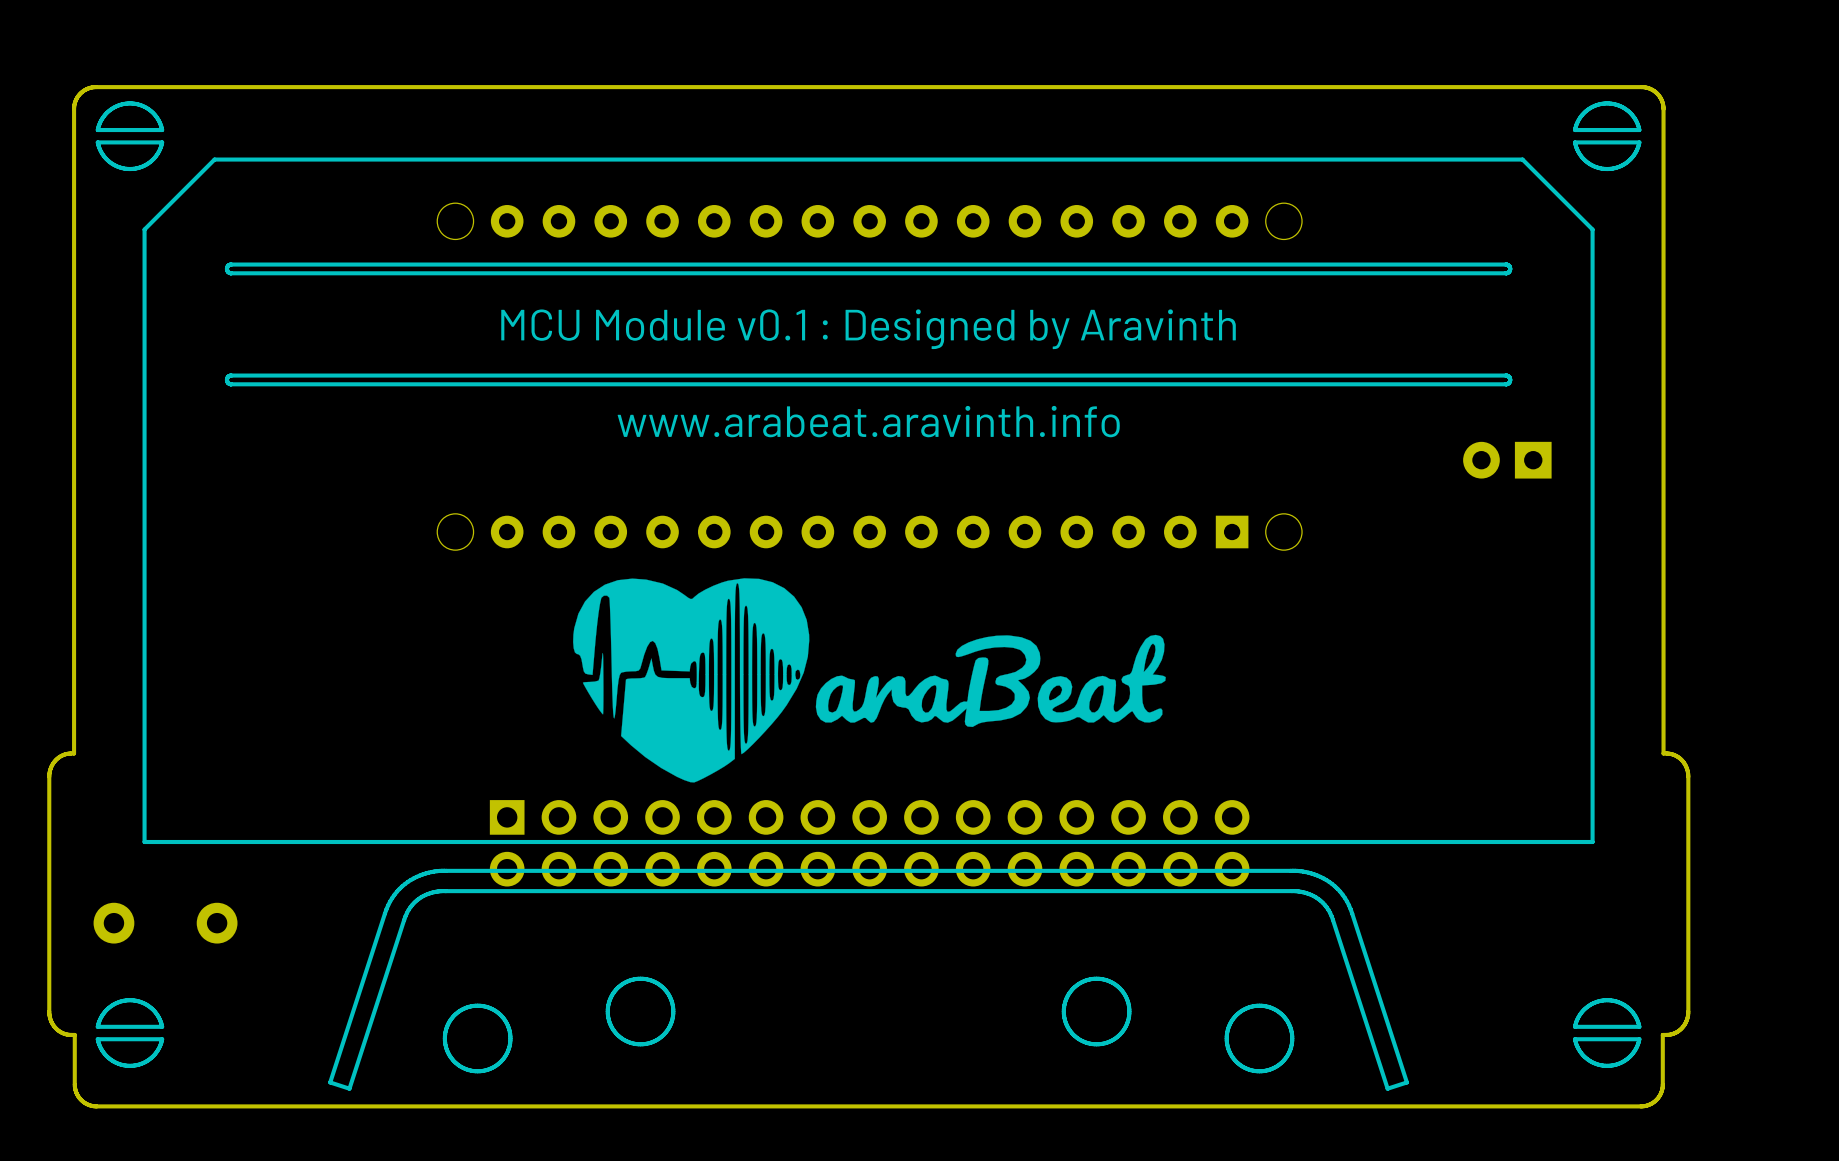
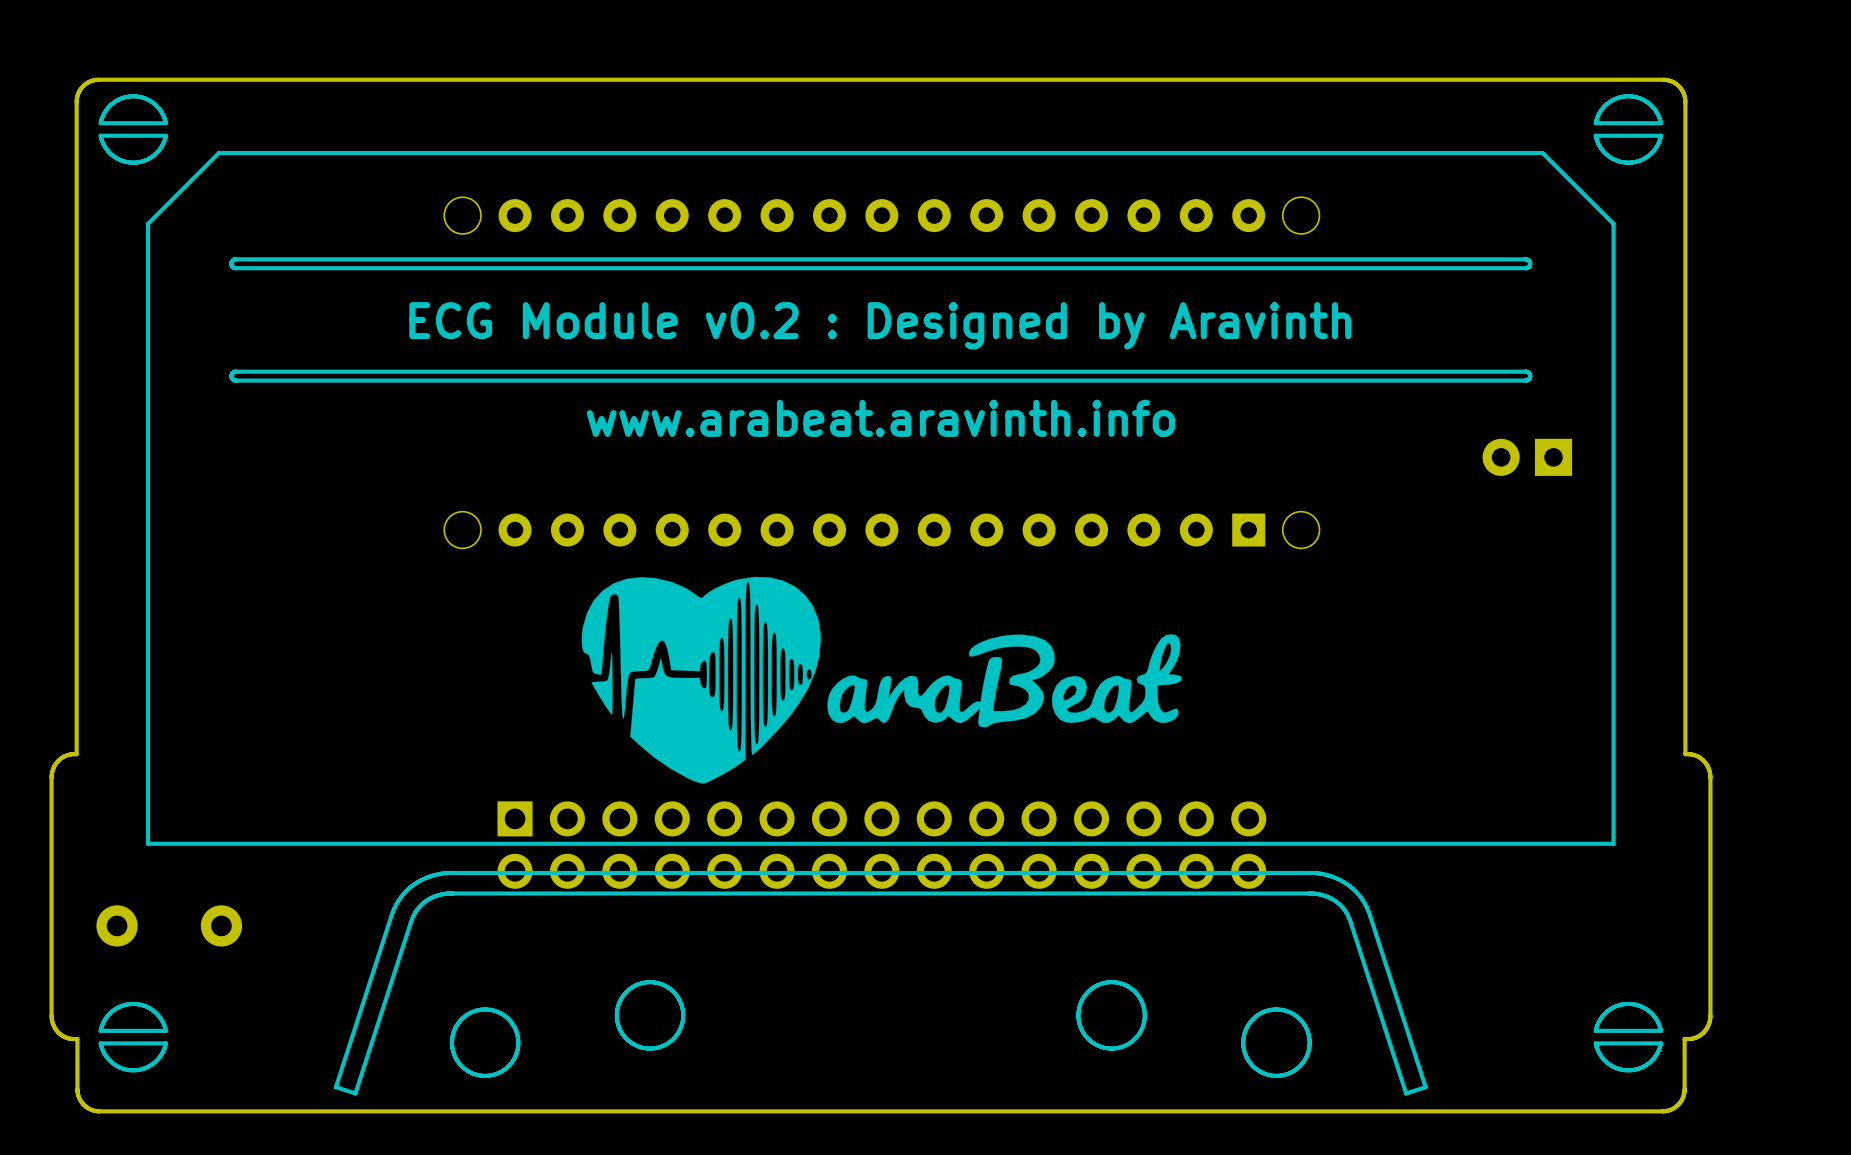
text: MCU Module v0.1 : Designed by Aravinth (868, 329) -> ECG Module v0.2 : Designed by Aravinth (880, 325)

